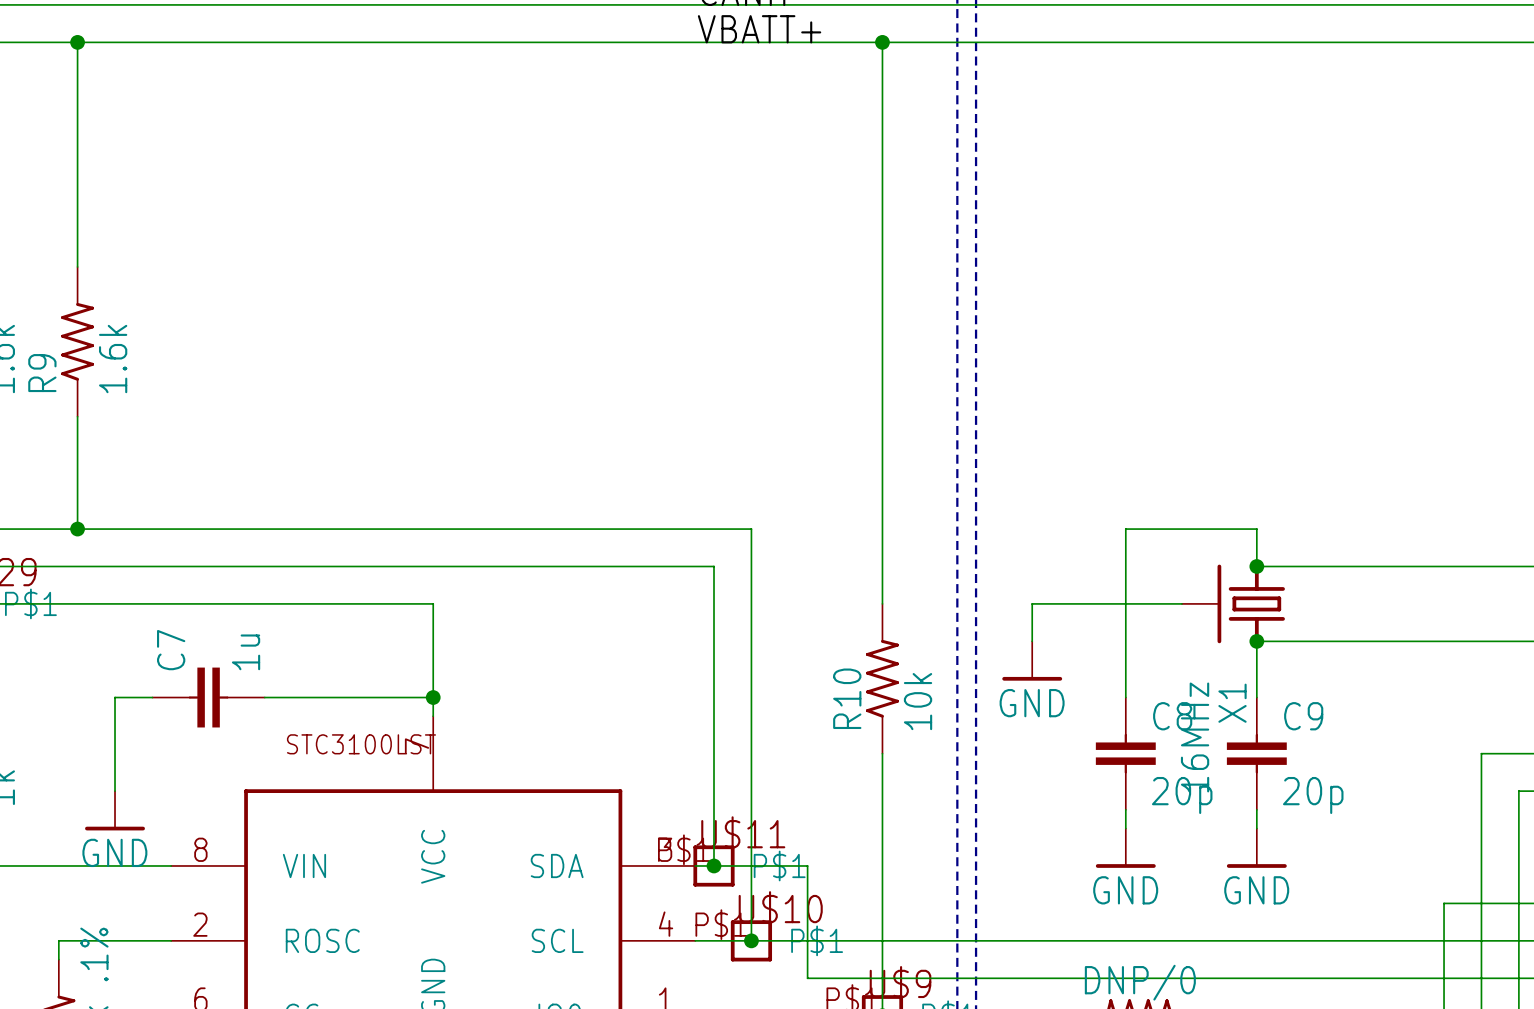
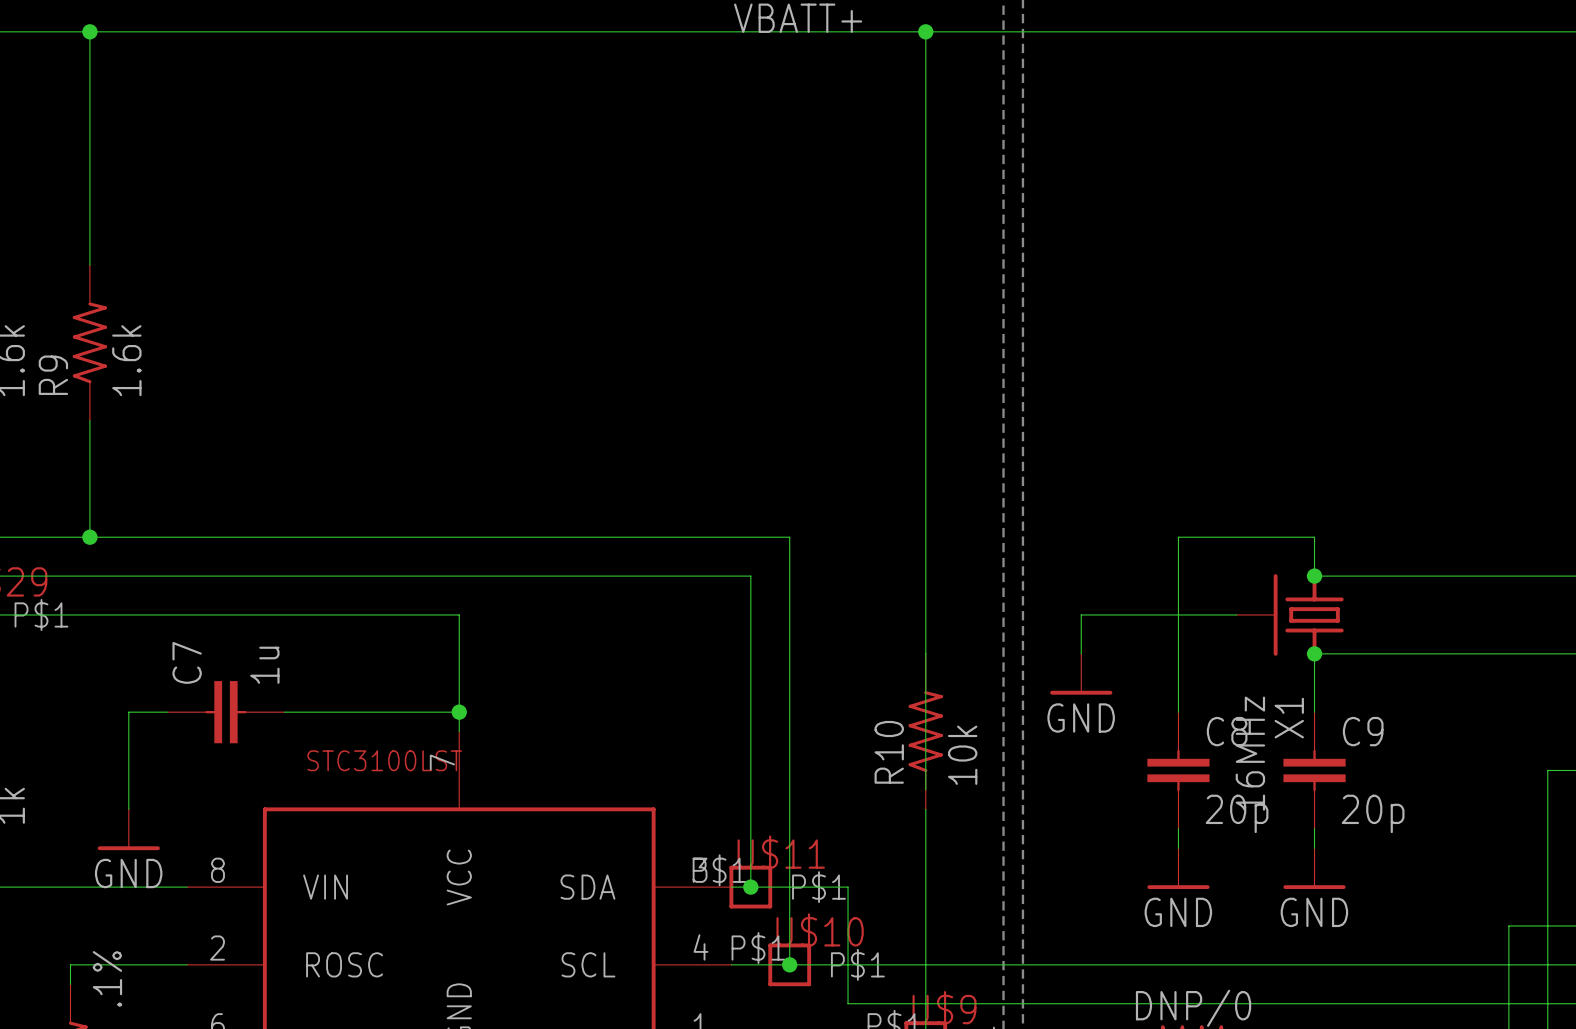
R10 position: (882, 678) -> (925, 731)

